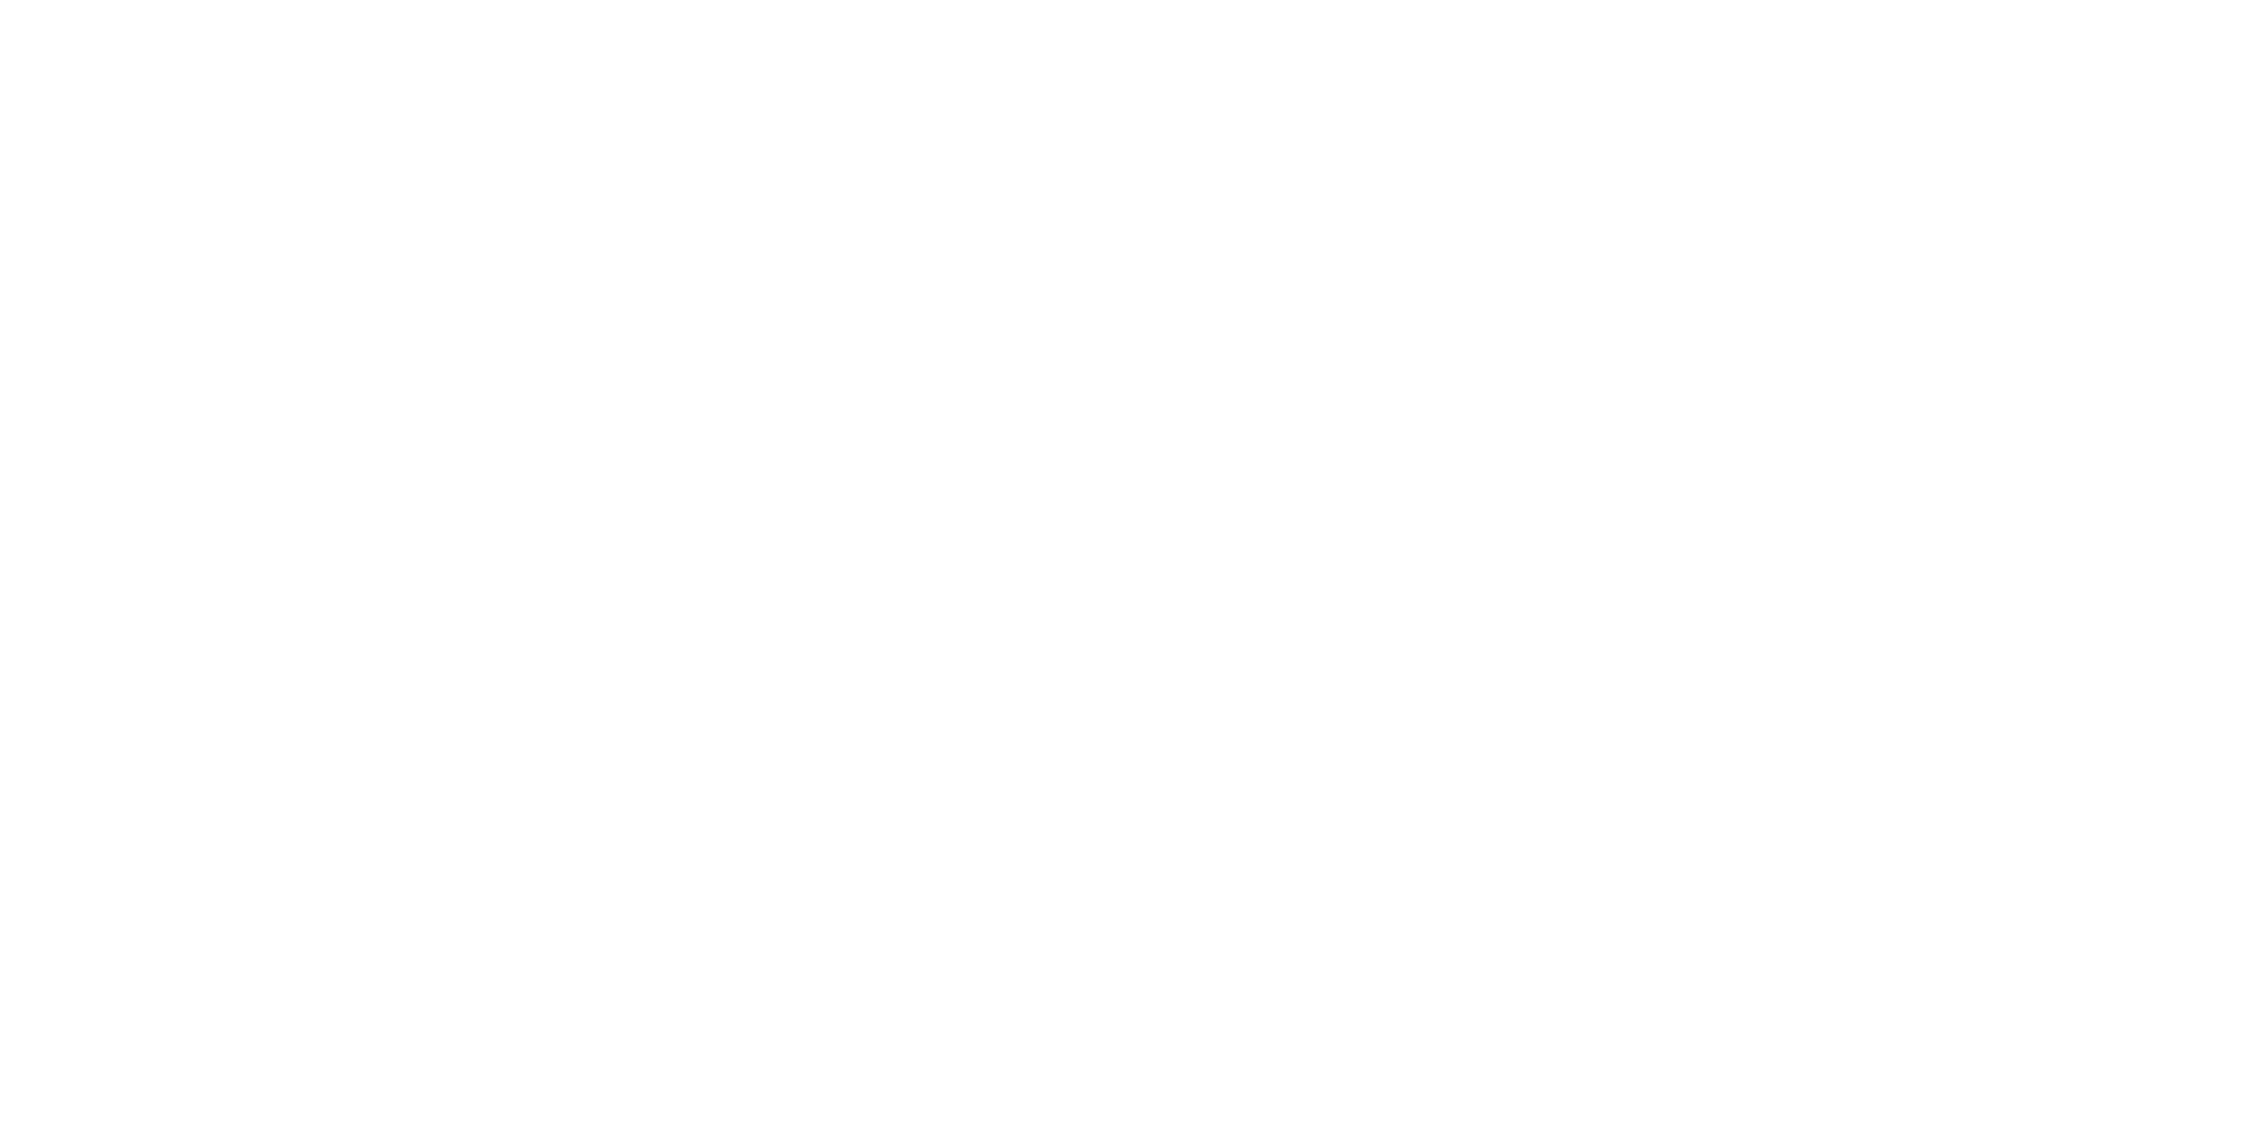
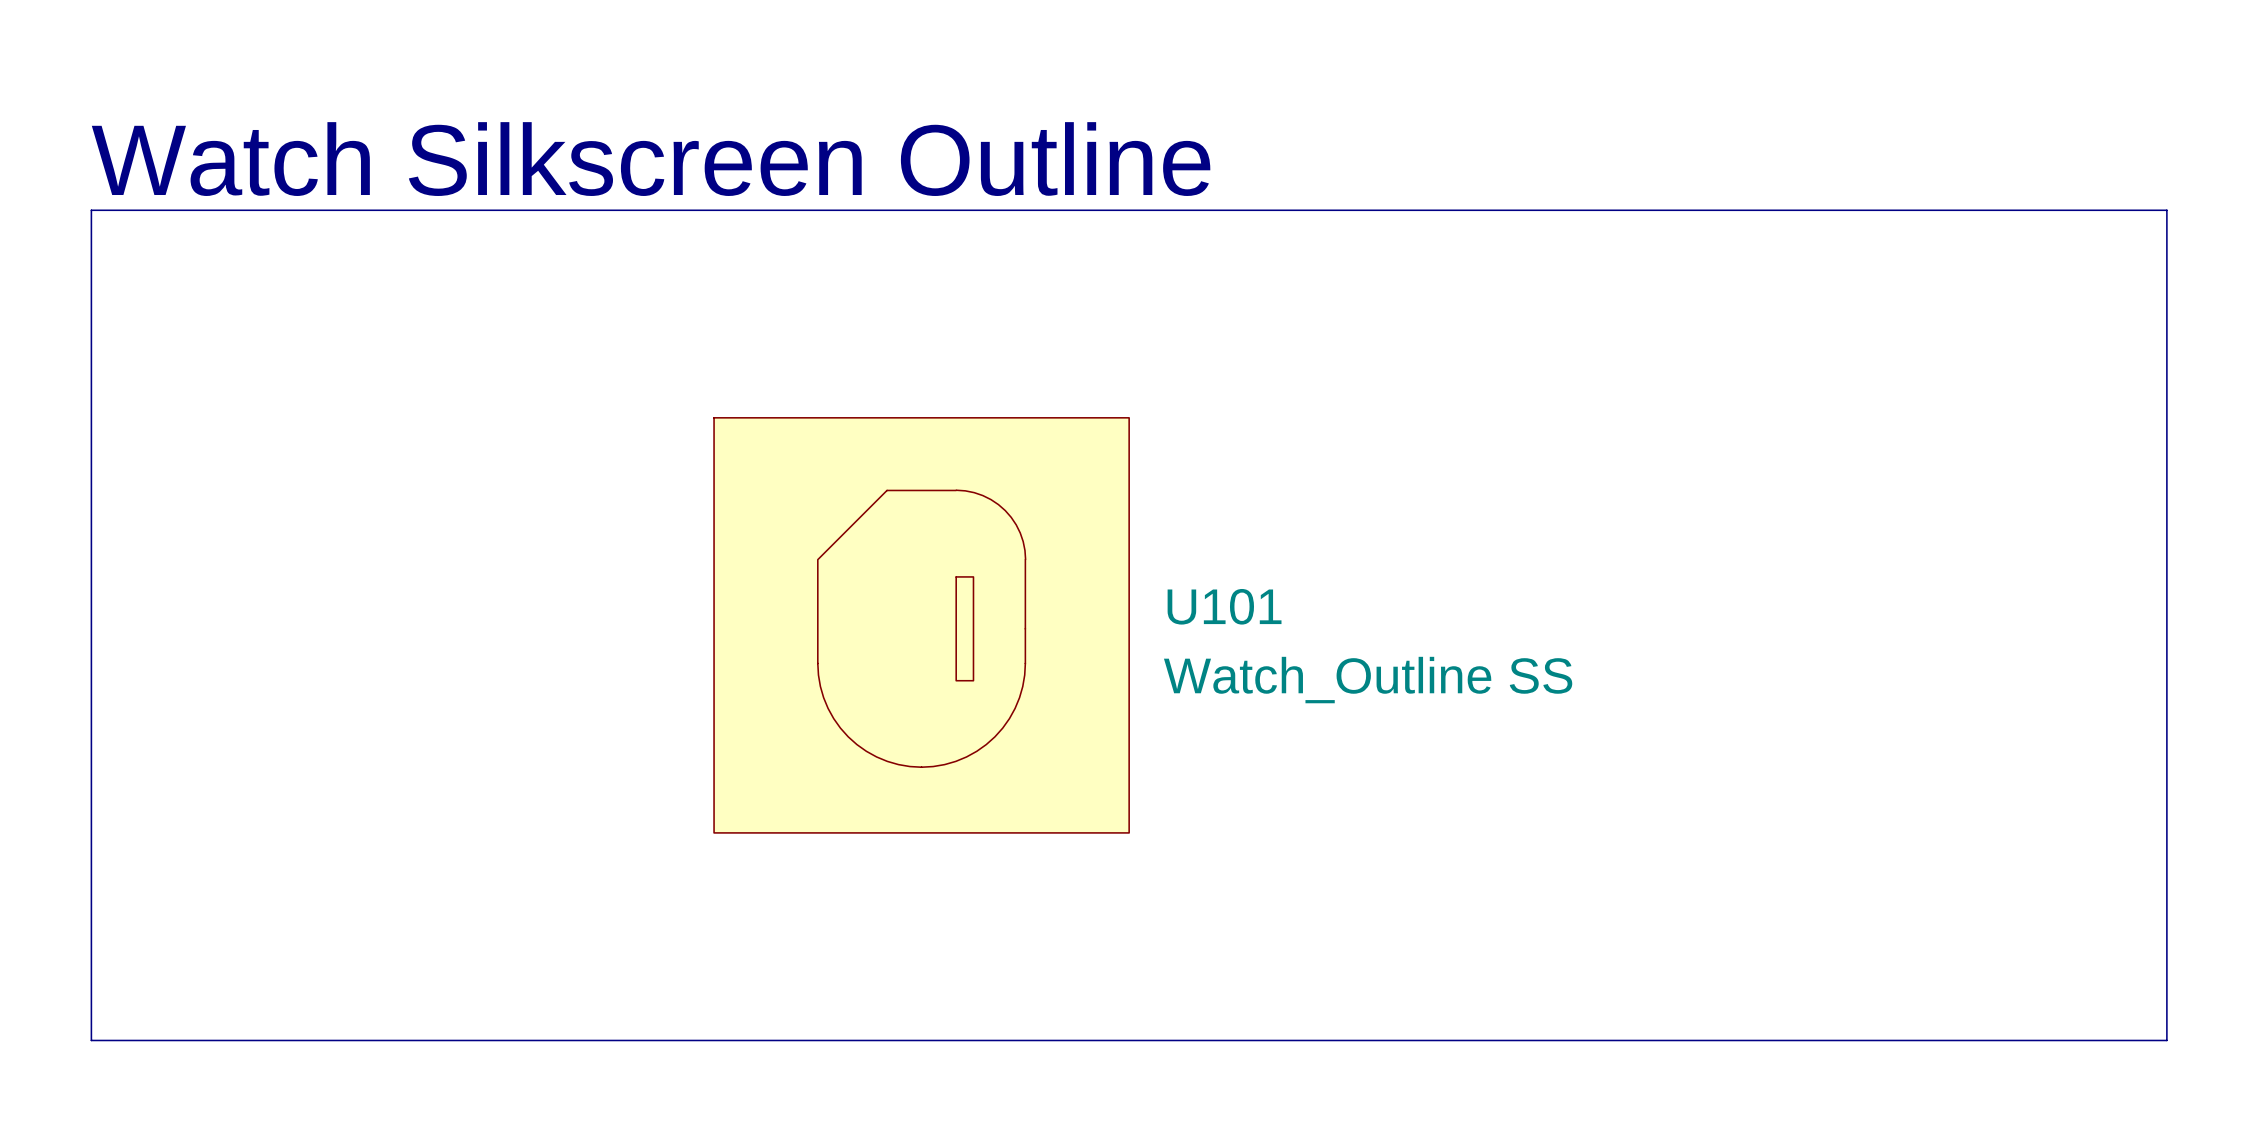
text: none -> Watch Silkscreen Outline (651, 159)
line: none -> (91, 210) (2166, 210) (2166, 1040) (91, 1040) (91, 210)
U101: none -> Watch_Outline SS (921, 625)

